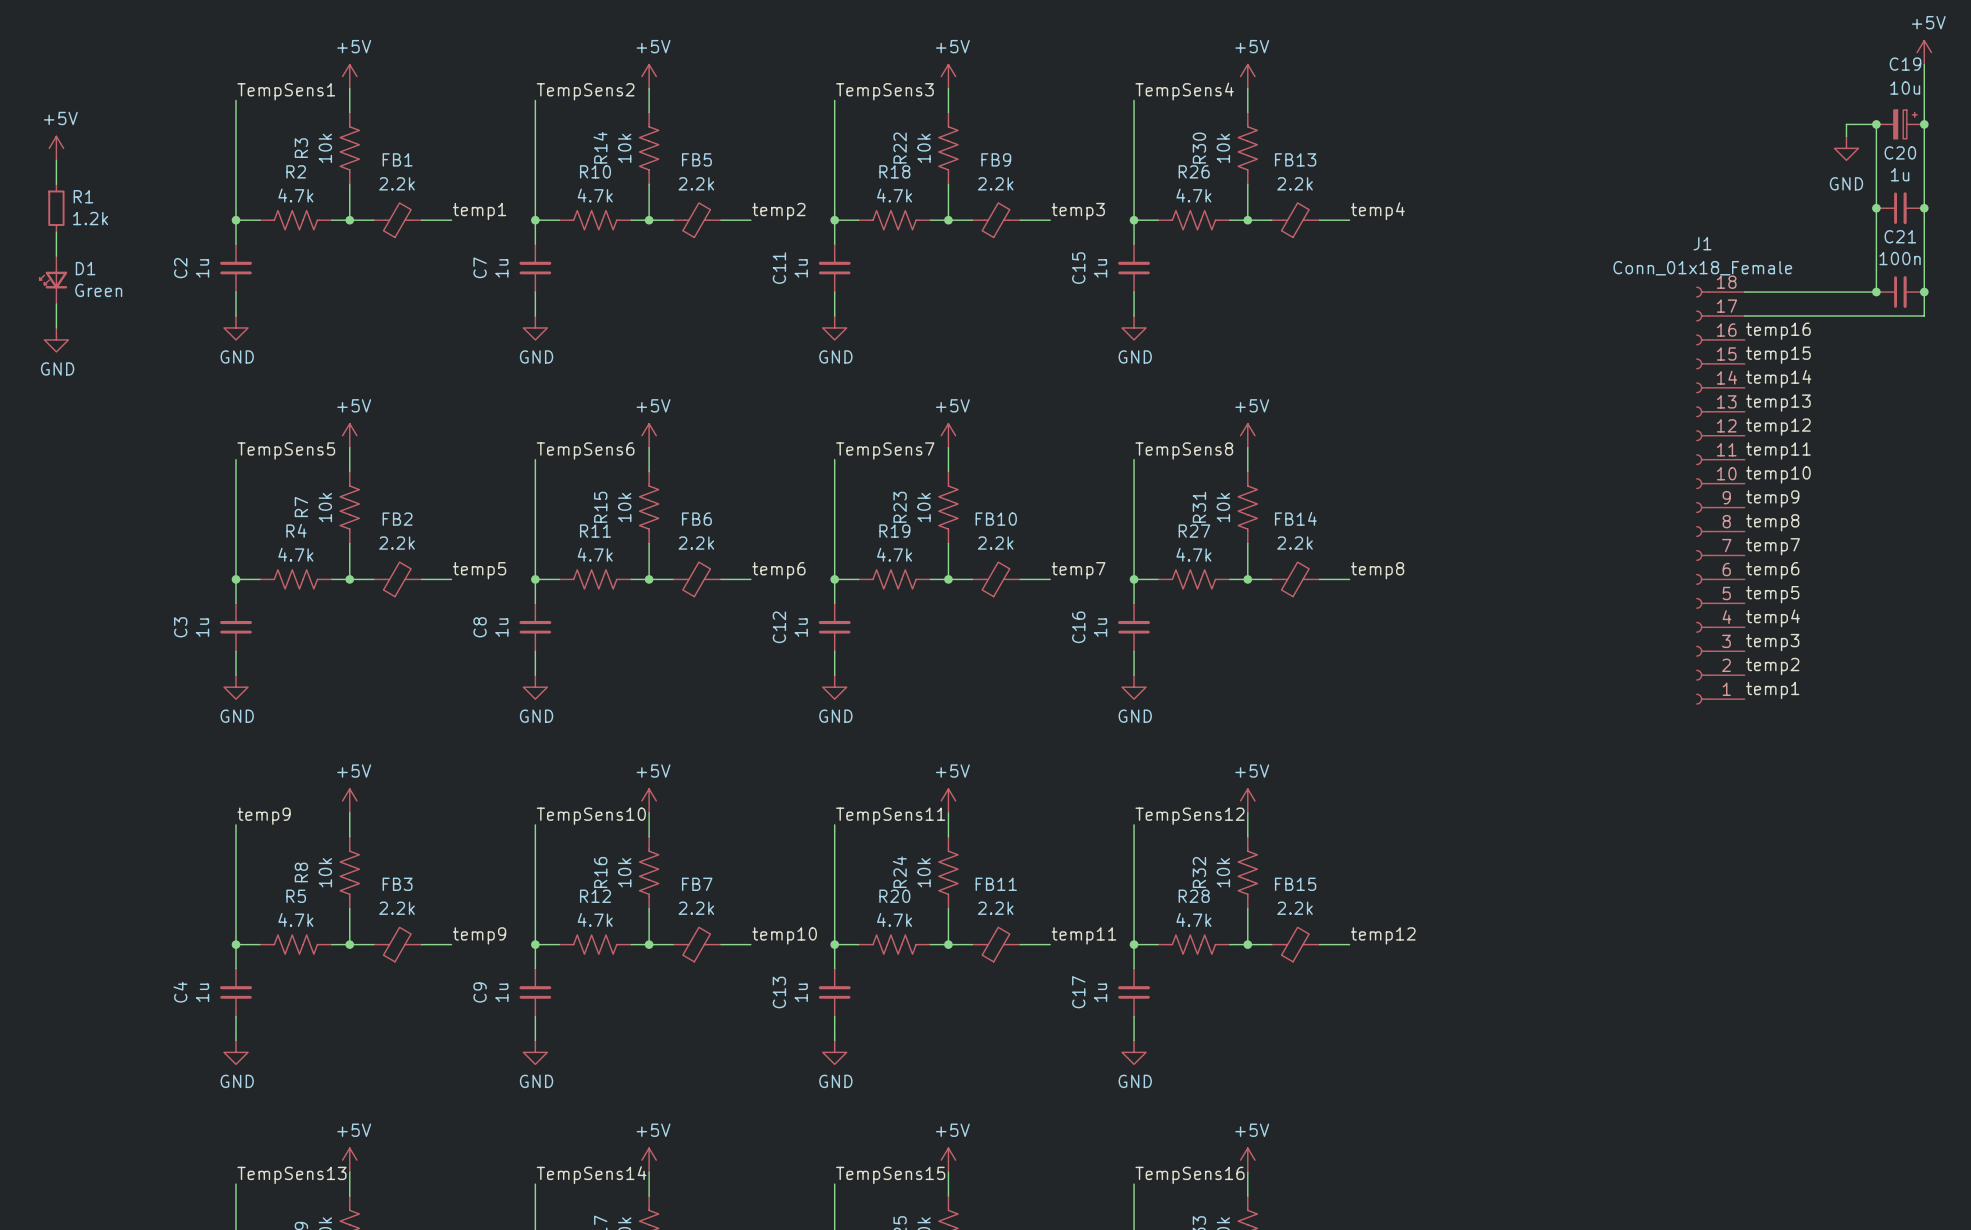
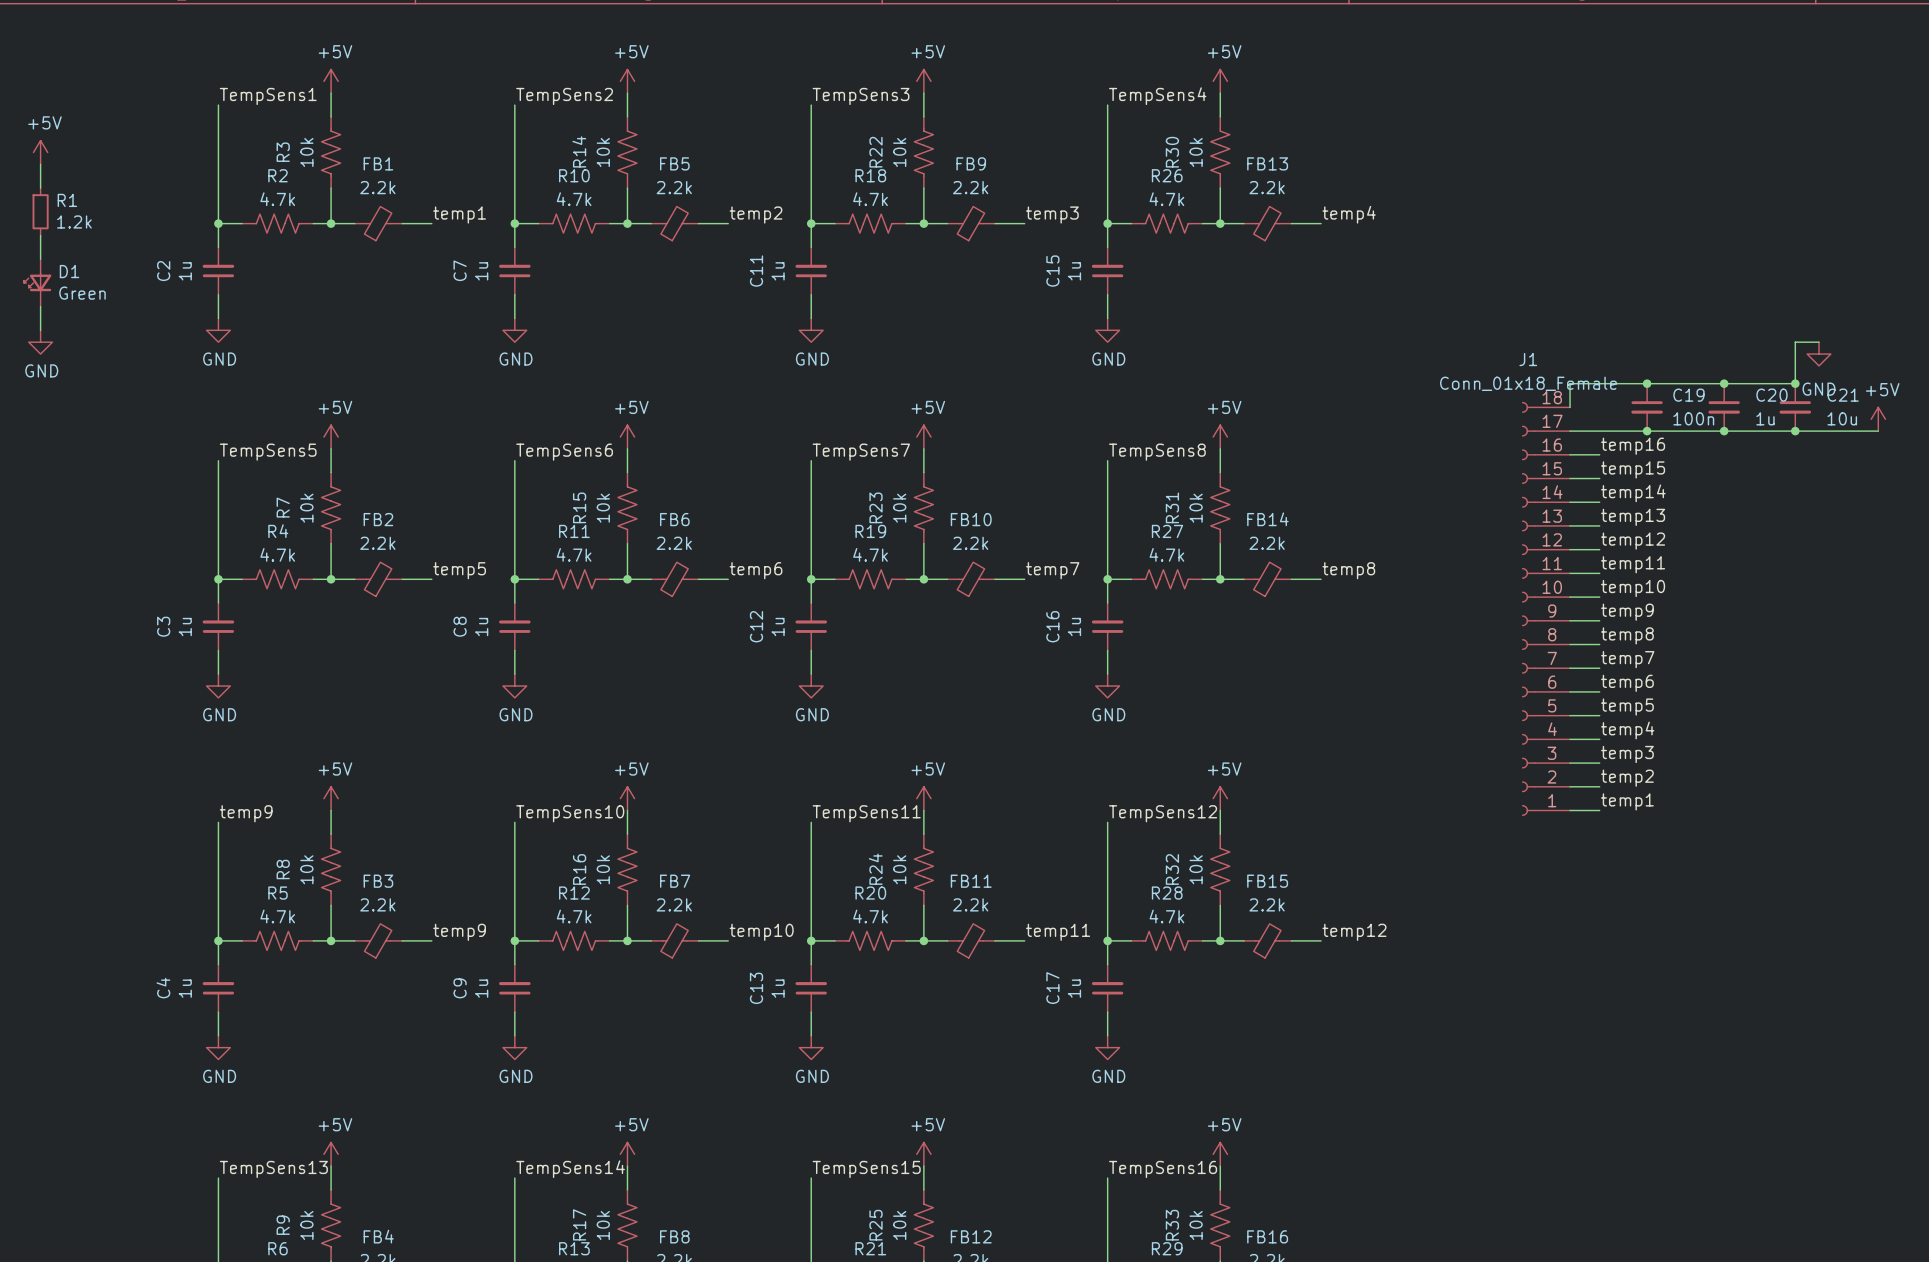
power symbol: +5V (1924, 52) -> none
C19 name position: C19 (1905, 64) -> C19 (1688, 395)
wire: (1924, 64) (1924, 315) (1744, 315) -> none
C19 value: 10u (1905, 88) -> 100n (1693, 418)
C19 symbol: [1876, 110, 1925, 139] -> [1631, 383, 1663, 432]
junction: (1876, 124) -> none
junction: (1924, 124) -> none
wire: (1846, 136) (1846, 124) (1876, 124) (1876, 292) (1744, 292) -> none
power symbol position: GND (1846, 148) -> GND (1819, 354)
junction: (1876, 208) -> none
C20 rotation: 0° (1900, 208) -> 90° clockwise (1724, 407)
C20 position: (1900, 208) -> (1724, 407)
junction: (1924, 208) -> none
C21 value: 100n (1900, 258) -> 10u (1842, 418)
junction: (1876, 292) -> none
C21 rotation: 0° (1900, 292) -> 90° clockwise (1795, 407)
C21 position: (1900, 292) -> (1795, 407)
junction: (1924, 292) -> none
label position: temp16 (1778, 331) -> temp16 (1633, 446)
wire: none -> (1819, 342) (1795, 342) (1795, 383) (1570, 383) (1570, 407)
label position: temp15 (1778, 355) -> temp15 (1633, 469)
label position: temp14 (1778, 378) -> temp14 (1633, 493)
junction: none -> (1647, 383)
junction: none -> (1724, 383)
junction: none -> (1795, 383)
label position: temp13 (1778, 403) -> temp13 (1633, 517)
power symbol: none -> +5V (1878, 419)
label position: temp12 (1778, 427) -> temp12 (1633, 541)
wire: none -> (1570, 431) (1878, 431)
junction: none -> (1647, 431)
junction: none -> (1724, 431)
junction: none -> (1795, 431)
label position: temp11 (1778, 450) -> temp11 (1633, 564)
wire: none -> (1570, 454) (1599, 454)
label position: temp10 (1778, 474) -> temp10 (1633, 588)
wire: none -> (1570, 478) (1599, 478)
J1 position: (1720, 495) -> (1545, 608)
label position: temp9 (1772, 498) -> temp9 (1627, 612)
wire: none -> (1570, 502) (1599, 502)
label position: temp8 (1772, 522) -> temp8 (1627, 635)
wire: none -> (1570, 525) (1599, 525)
label position: temp7 (1773, 546) -> temp7 (1627, 659)
wire: none -> (1570, 549) (1599, 549)
label position: temp6 (1772, 570) -> temp6 (1627, 683)
wire: none -> (1570, 573) (1599, 573)
label position: temp5 (1772, 594) -> temp5 (1627, 707)
wire: none -> (1570, 597) (1599, 597)
label position: temp4 (1773, 618) -> temp4 (1627, 730)
wire: none -> (1570, 620) (1599, 620)
label position: temp3 (1772, 642) -> temp3 (1627, 754)
wire: none -> (1570, 644) (1599, 644)
label position: temp2 (1772, 666) -> temp2 (1627, 778)
wire: none -> (1570, 668) (1599, 668)
label position: temp1 (1772, 690) -> temp1 (1627, 801)
wire: none -> (1570, 691) (1599, 691)
wire: none -> (1570, 715) (1599, 715)
wire: none -> (1570, 739) (1599, 739)
wire: none -> (1570, 763) (1599, 763)
wire: none -> (1570, 786) (1599, 786)
wire: none -> (1570, 810) (1599, 810)

